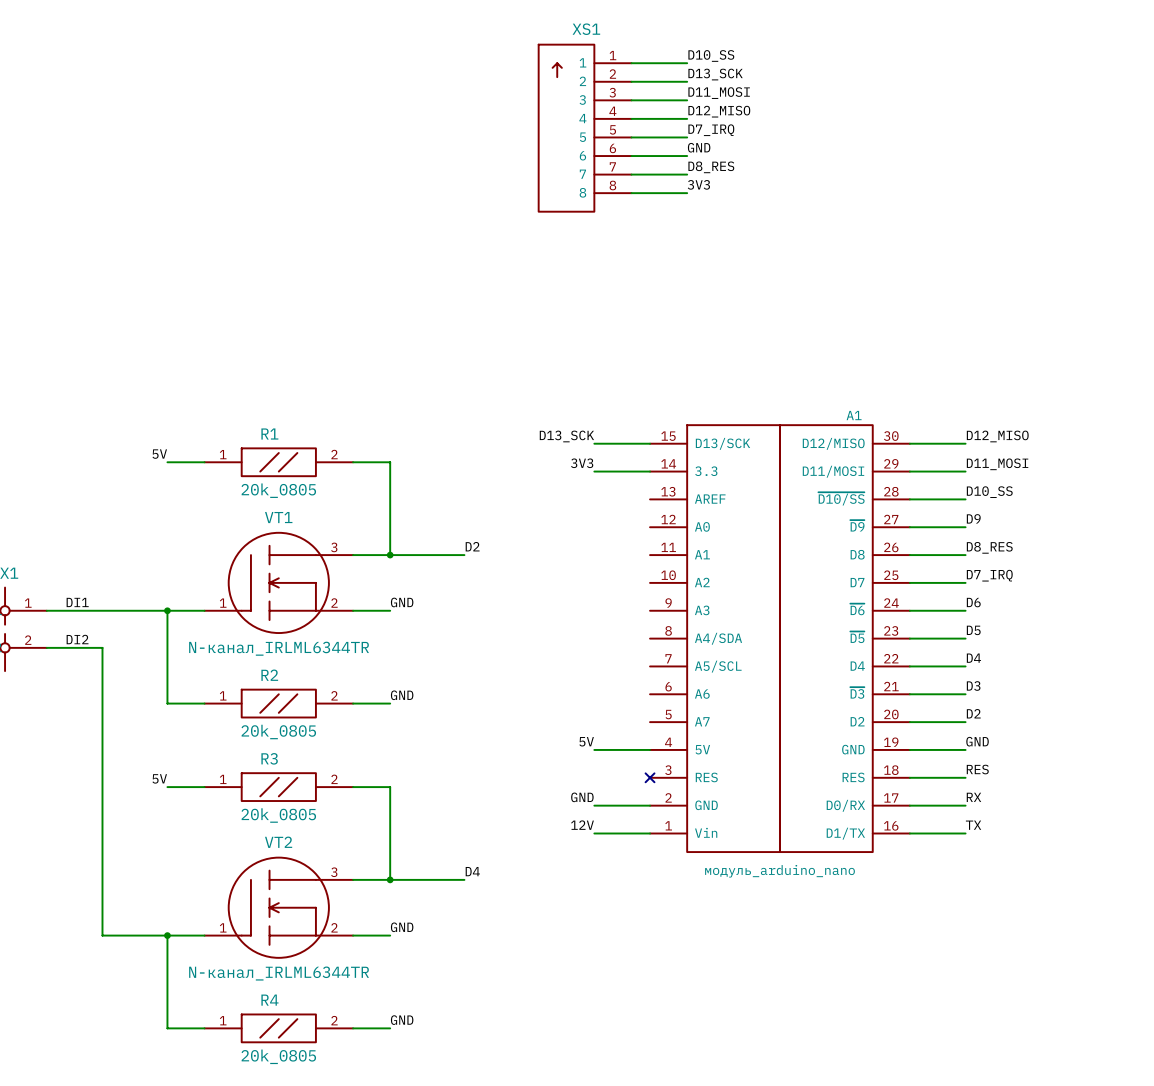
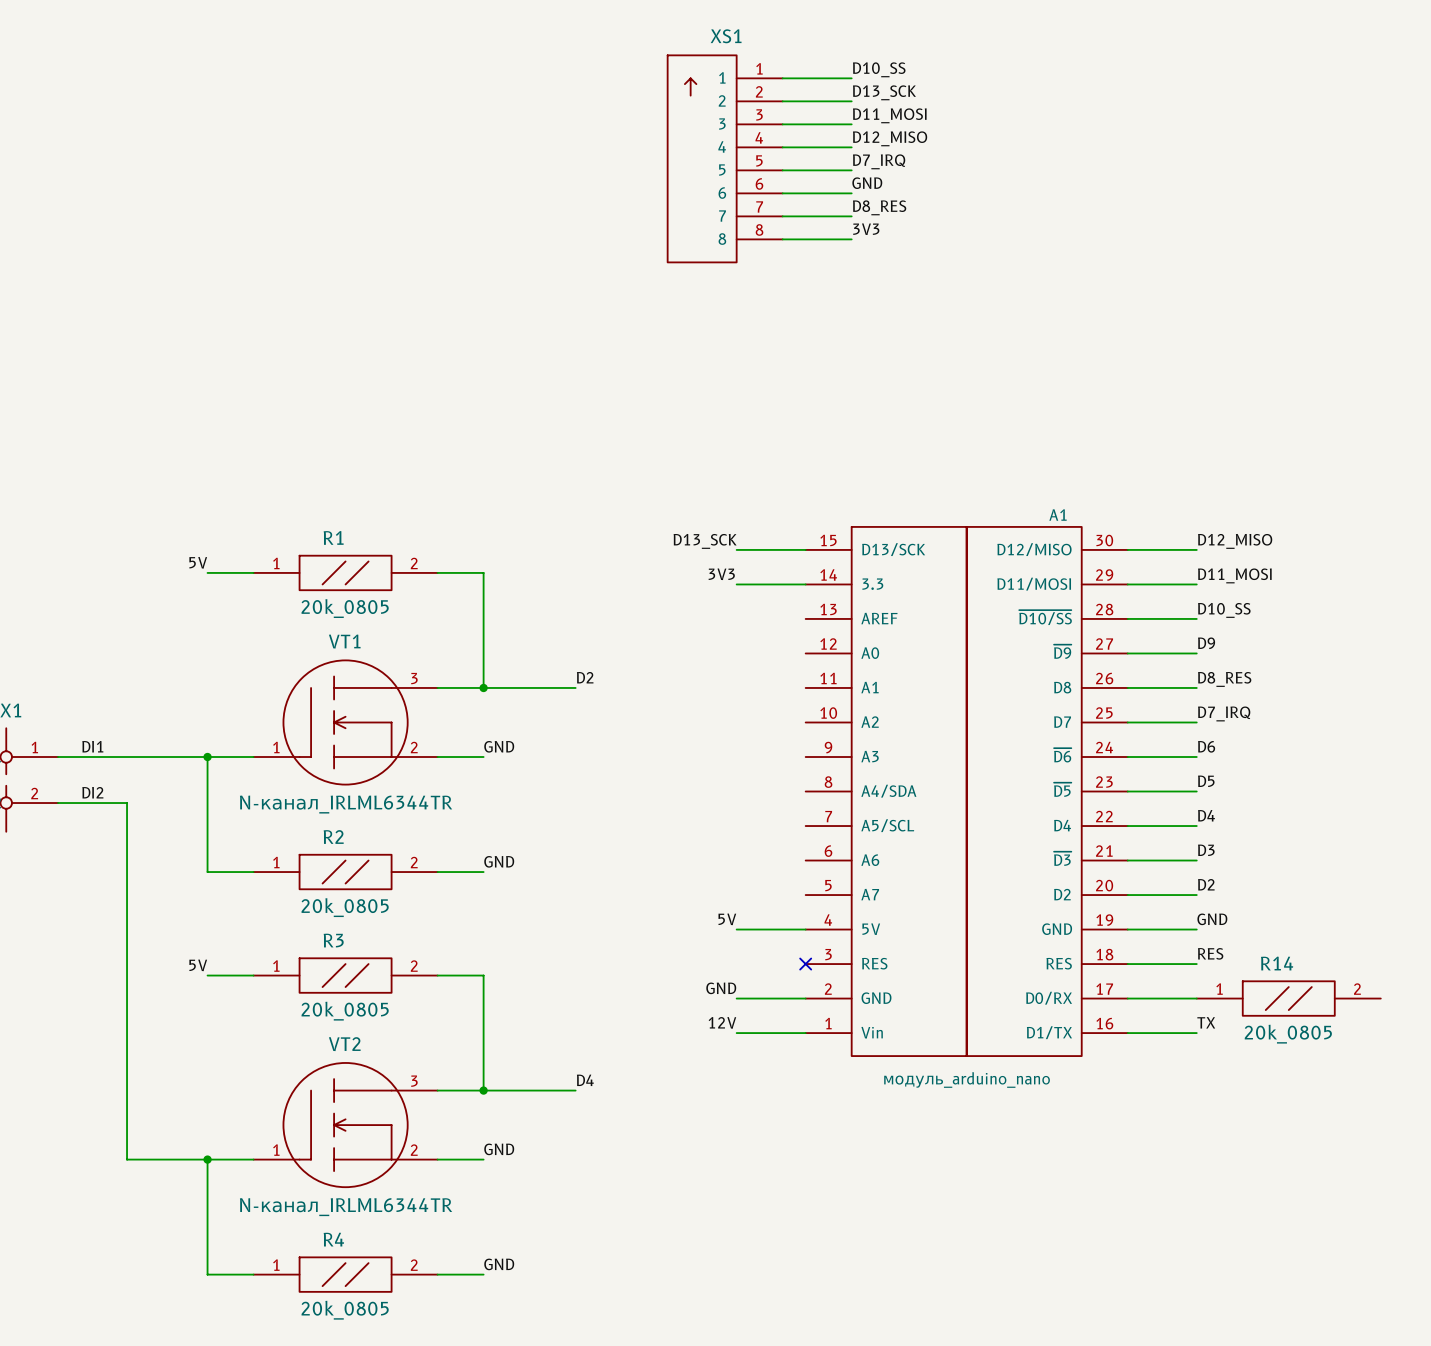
label: RX (973, 797) -> none
R14: none -> 20k_0805 (1288, 998)

